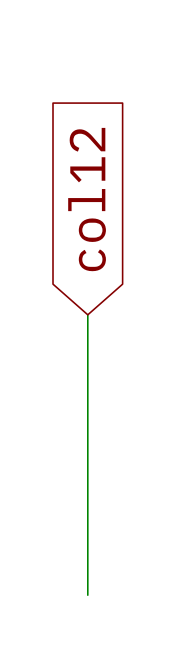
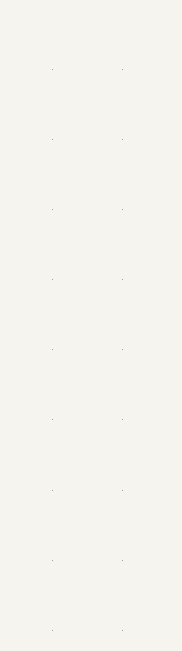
global label: col12 (87, 199) -> none
wire: (87, 314) (87, 595) -> none

